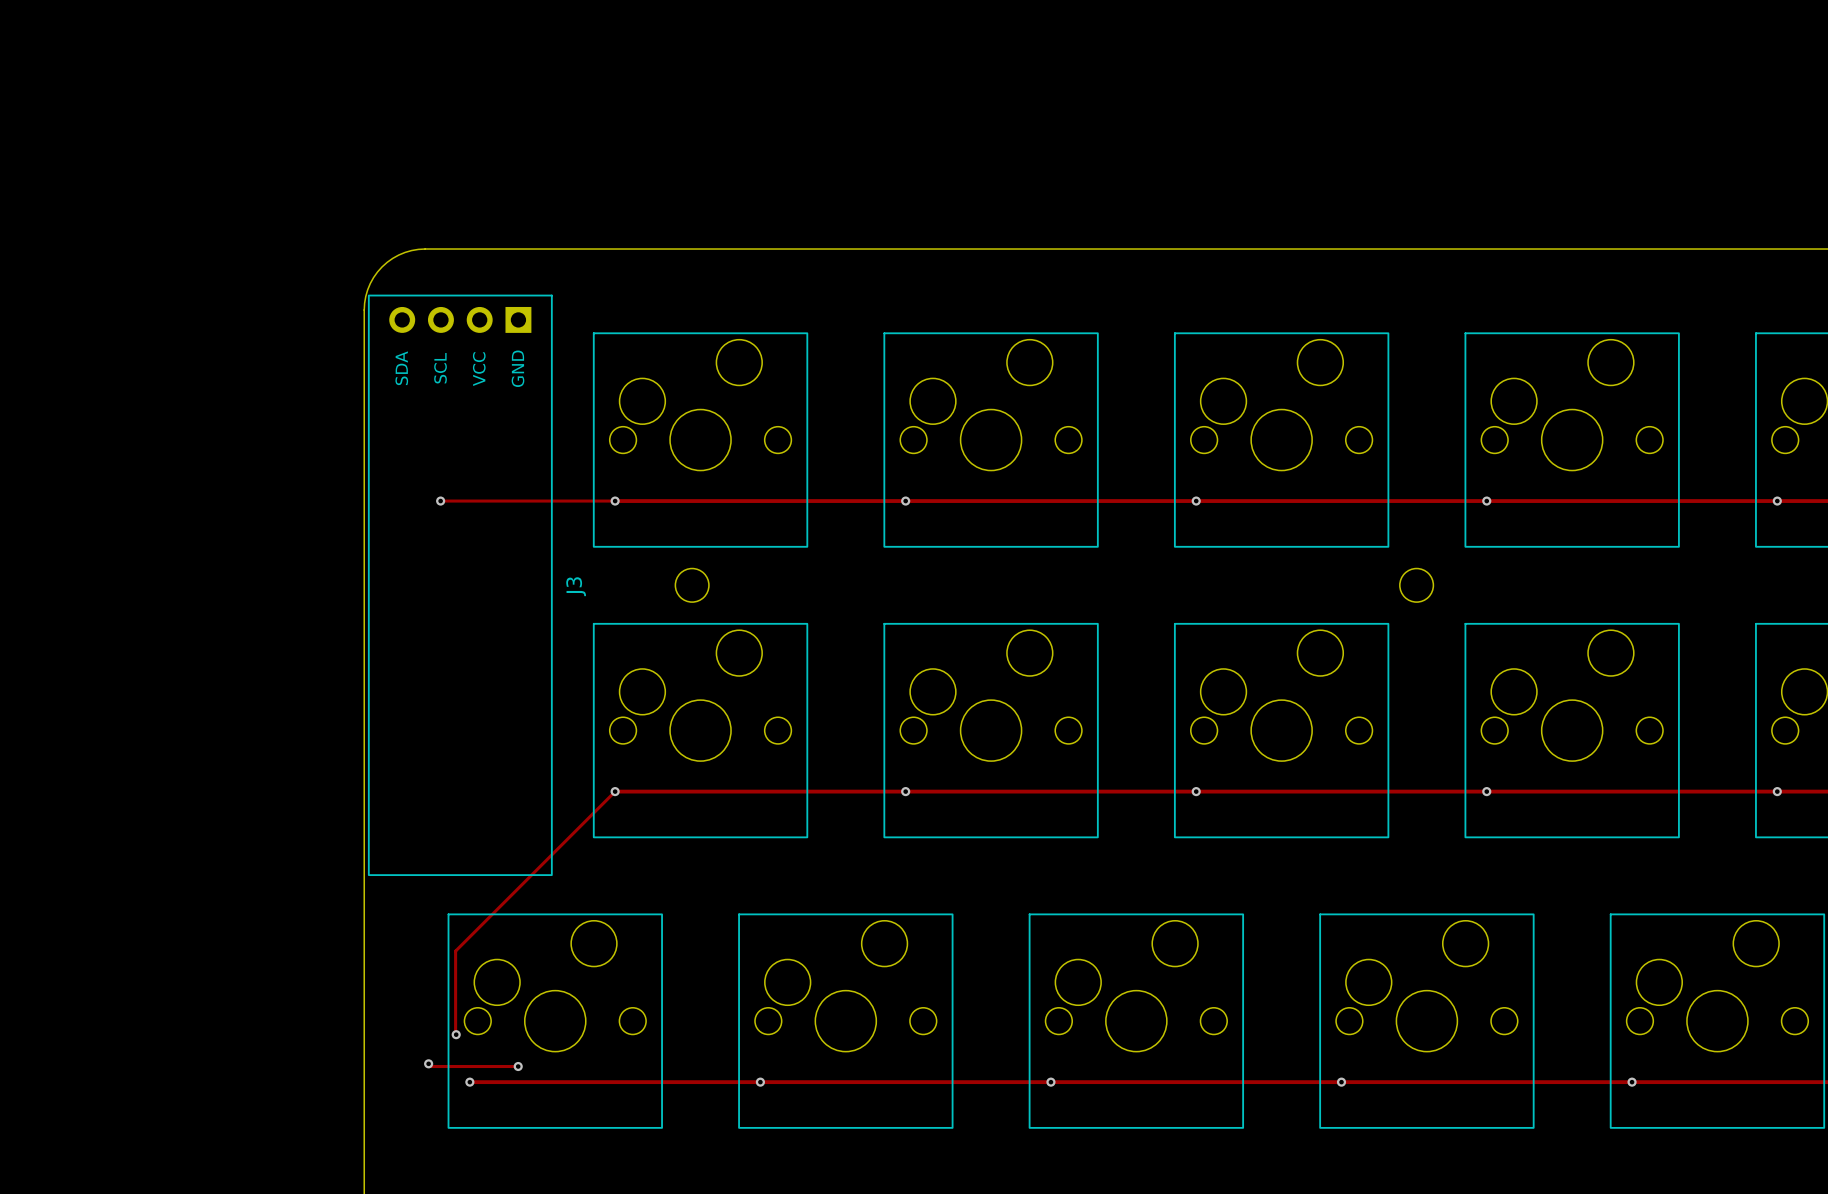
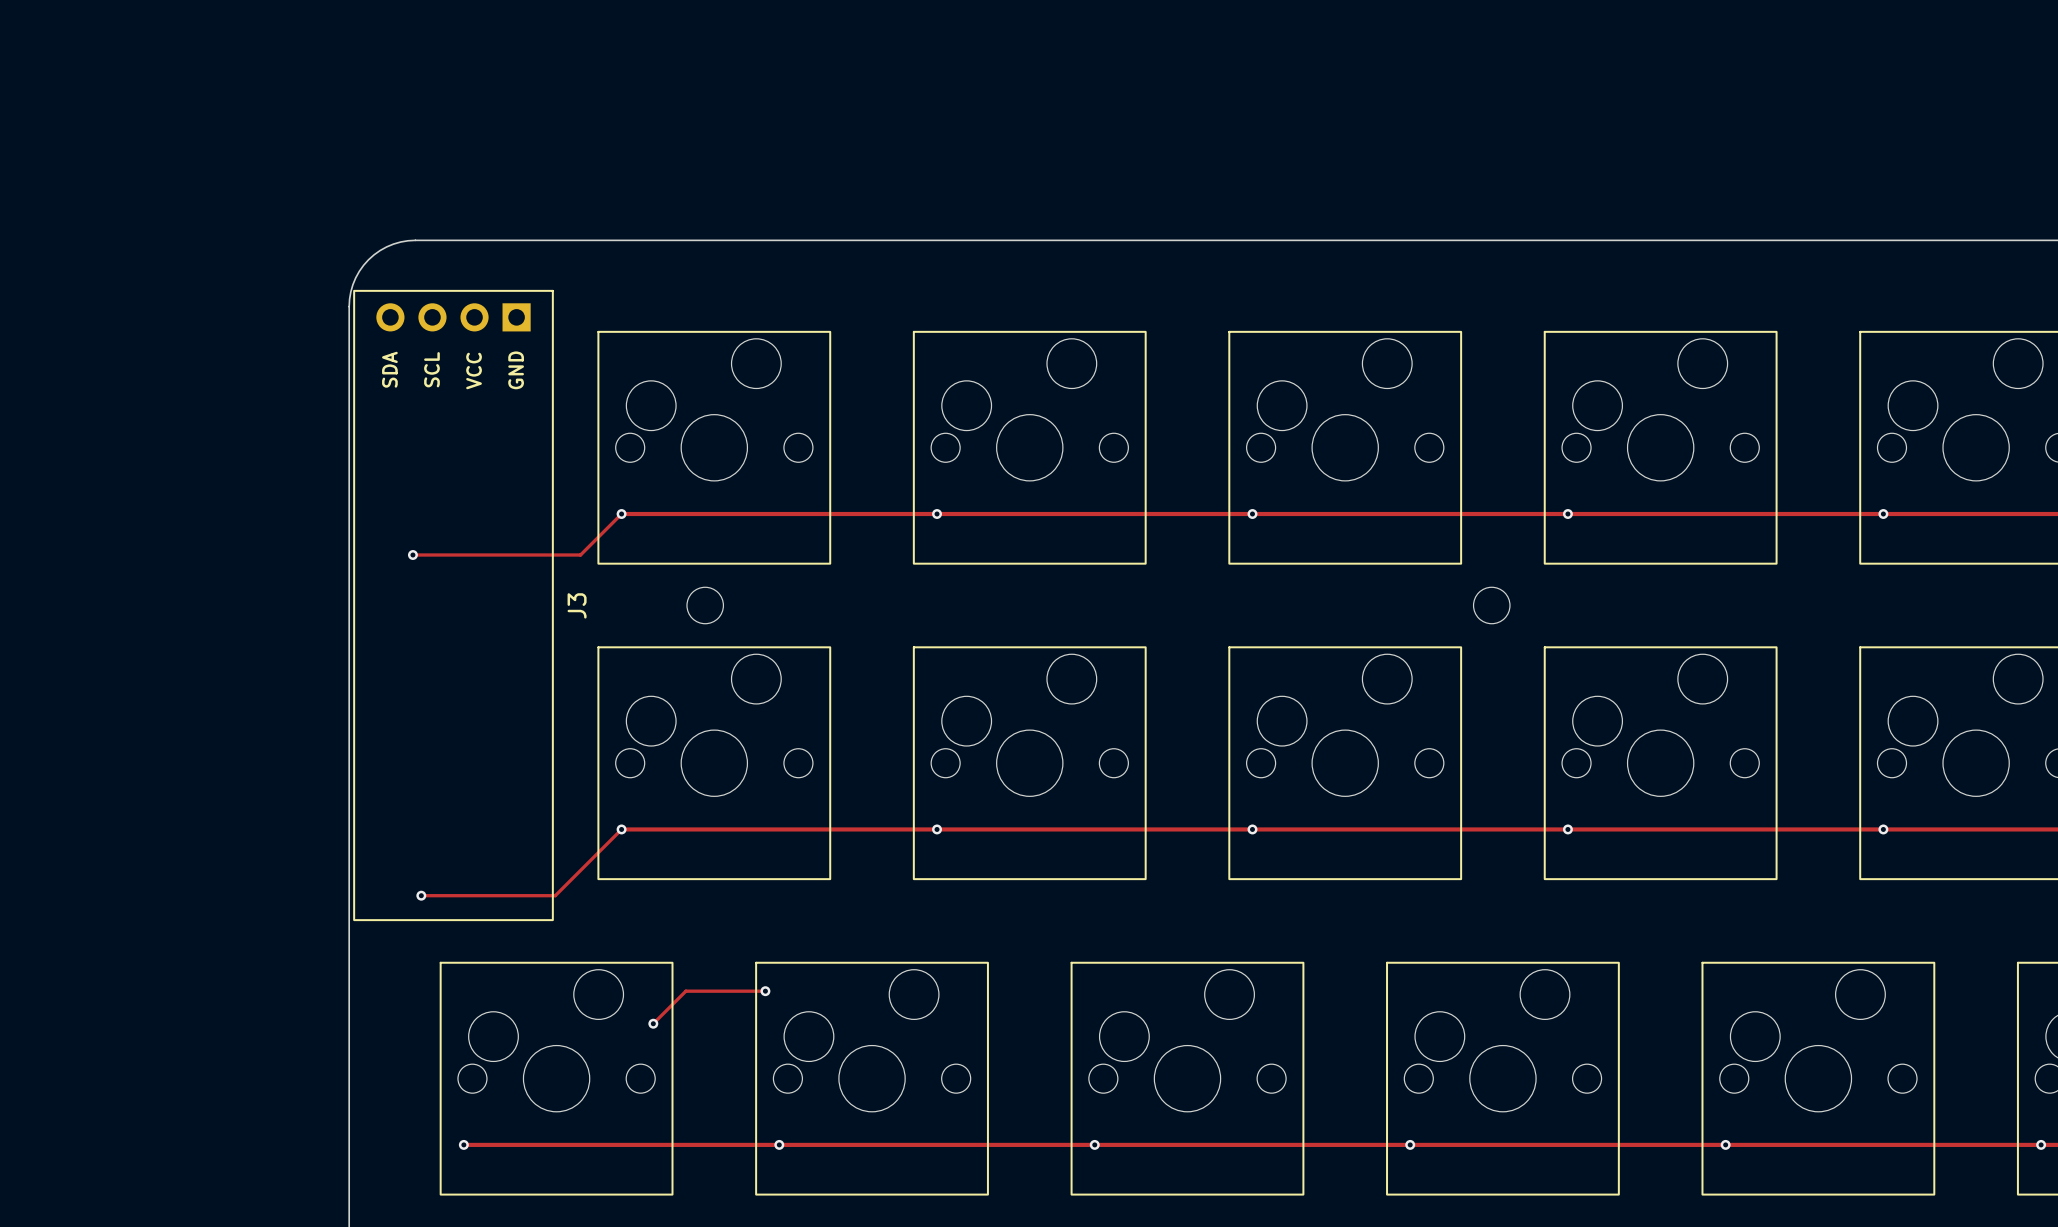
track: (440, 501) (615, 501) -> (412, 555) (580, 555) (621, 514)
via position: (440, 501) -> (412, 555)
via: none -> (421, 895)
track: (554, 852) (455, 951) (456, 1034) -> (555, 895) (421, 895)
track: none -> (765, 991) (685, 991) (653, 1023)
via: none -> (765, 991)
via: none -> (653, 1023)
via: (456, 1034) -> none
track: (428, 1063) (431, 1066) (518, 1066) -> none
via: (428, 1063) -> none
via: (518, 1066) -> none

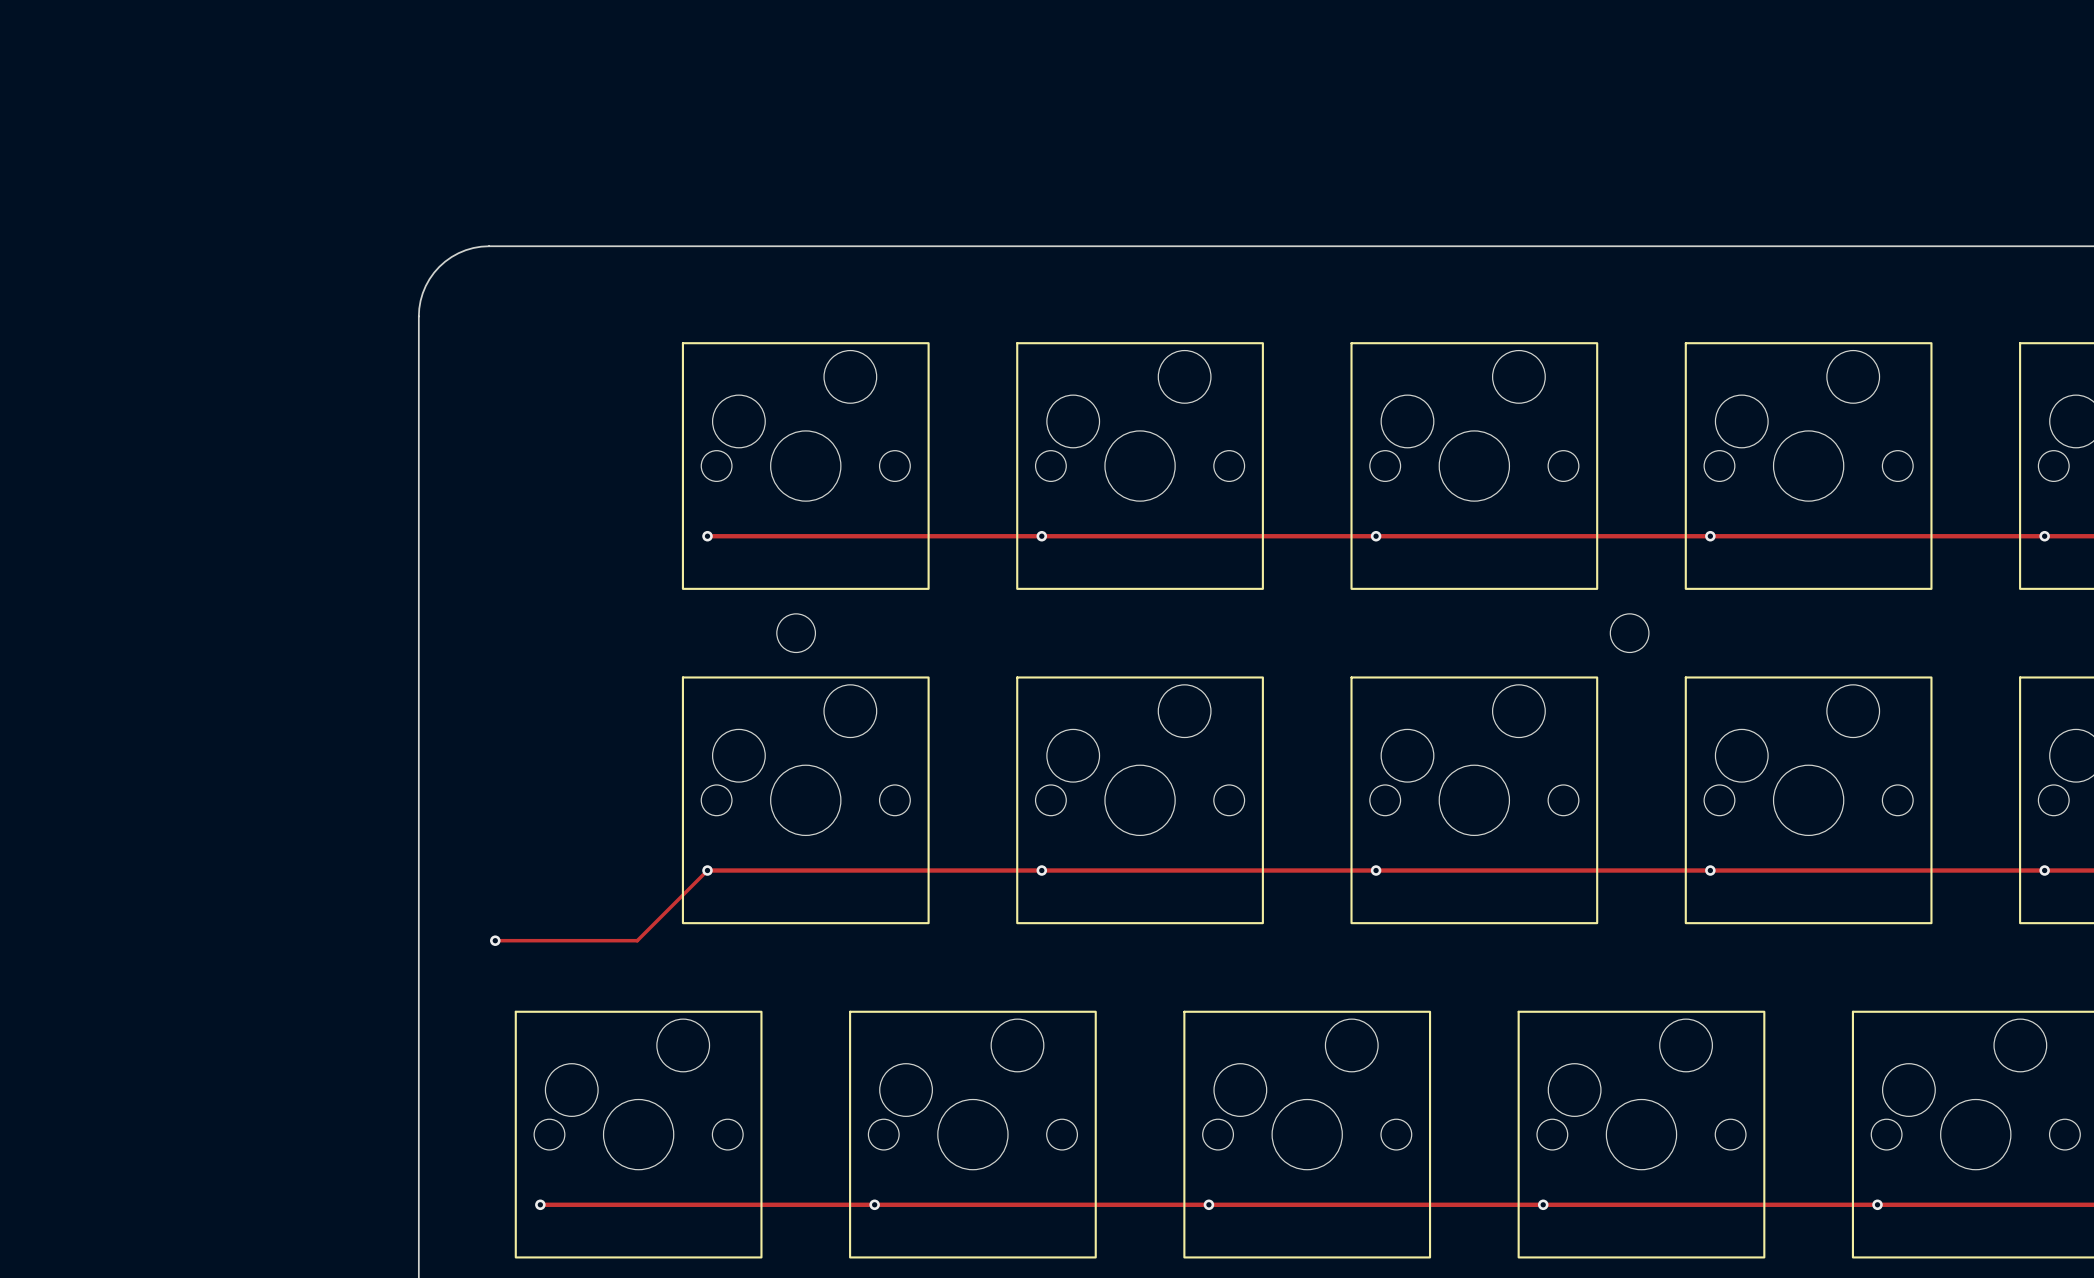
track: (621, 514) (580, 555) (412, 555) -> none
via: (412, 555) -> none
J3: (453, 605) -> none
track: (765, 991) (685, 991) (653, 1023) -> none
via: (765, 991) -> none
via: (653, 1023) -> none

